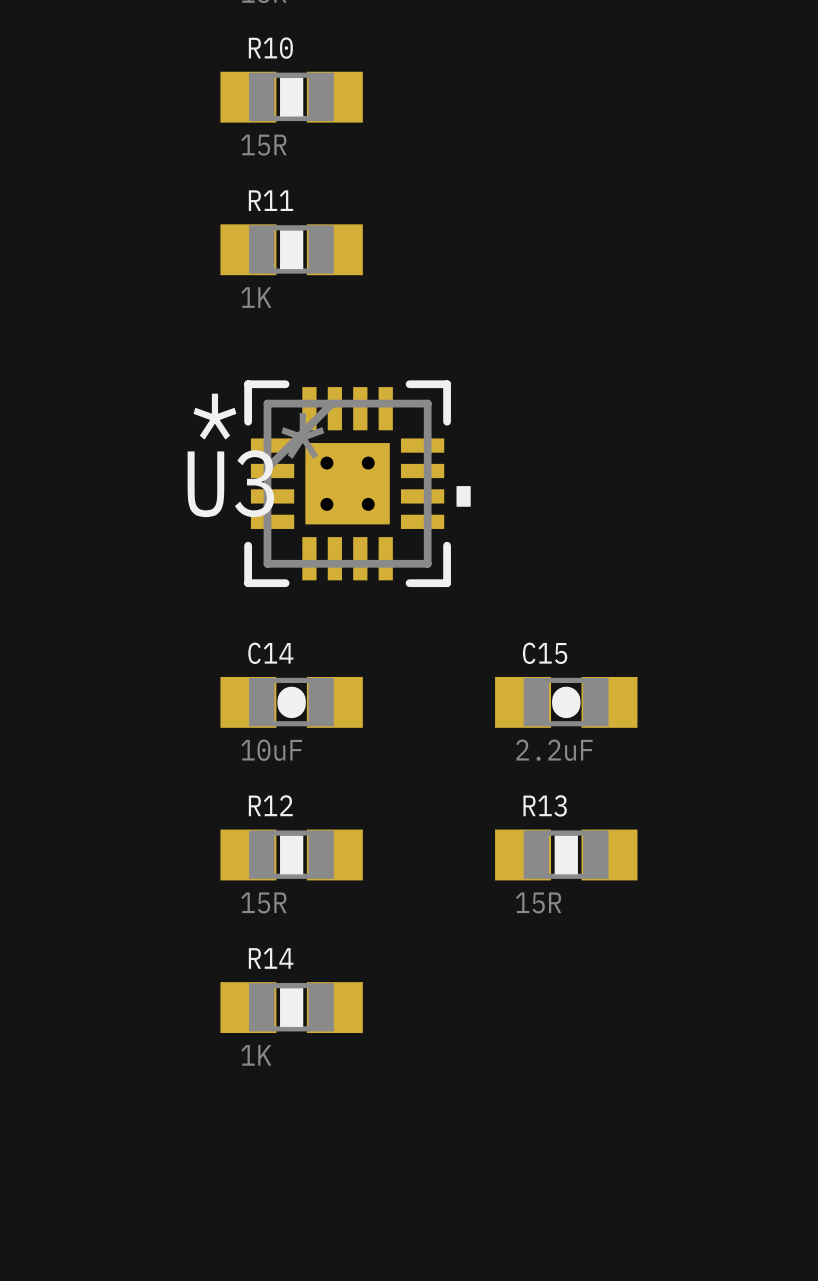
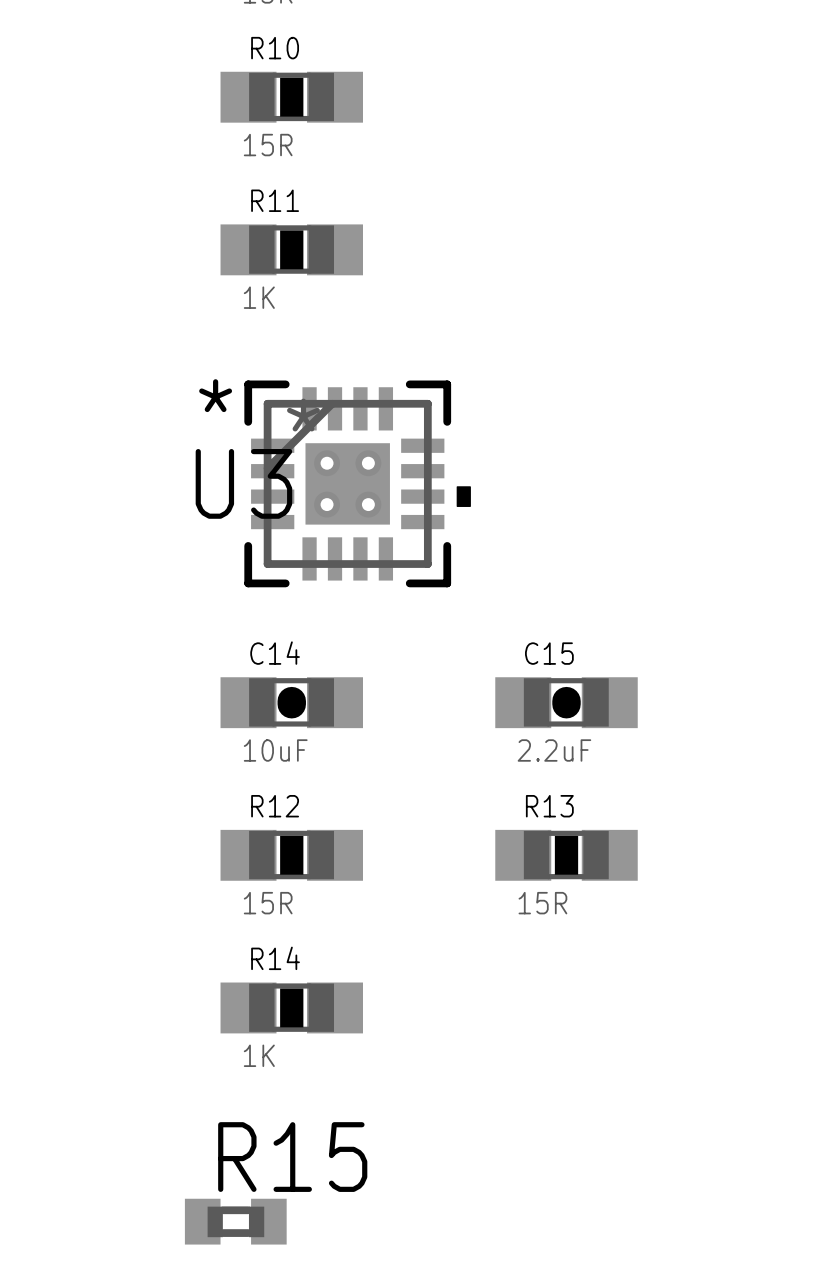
R15: none -> (235, 1221)

